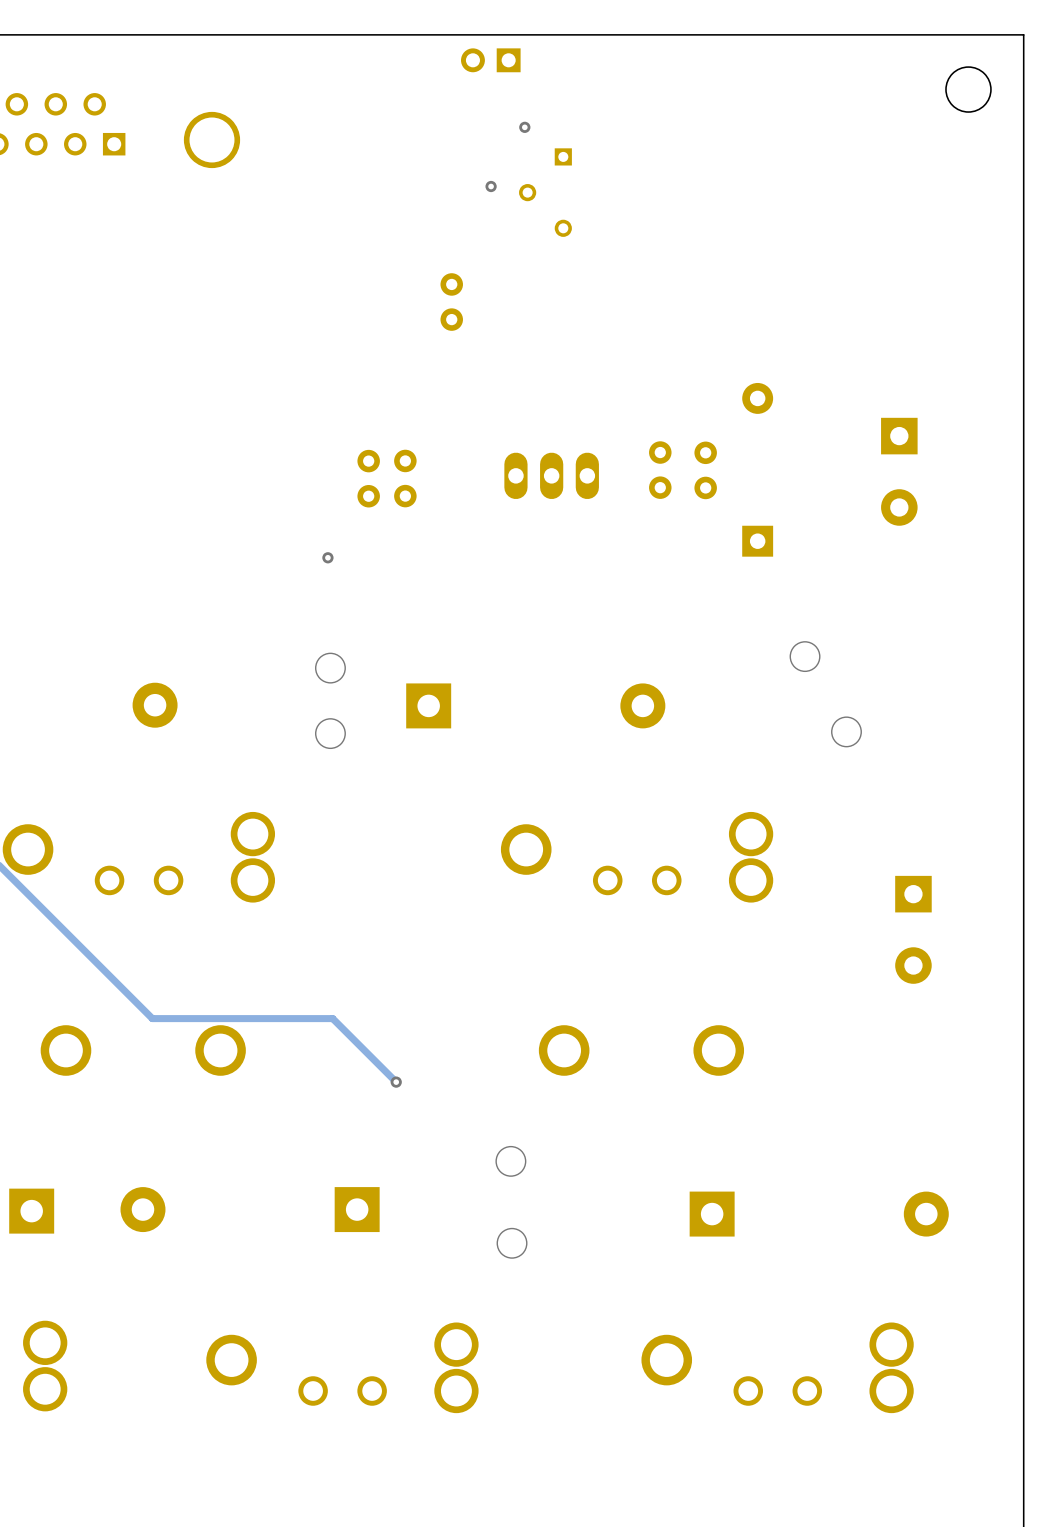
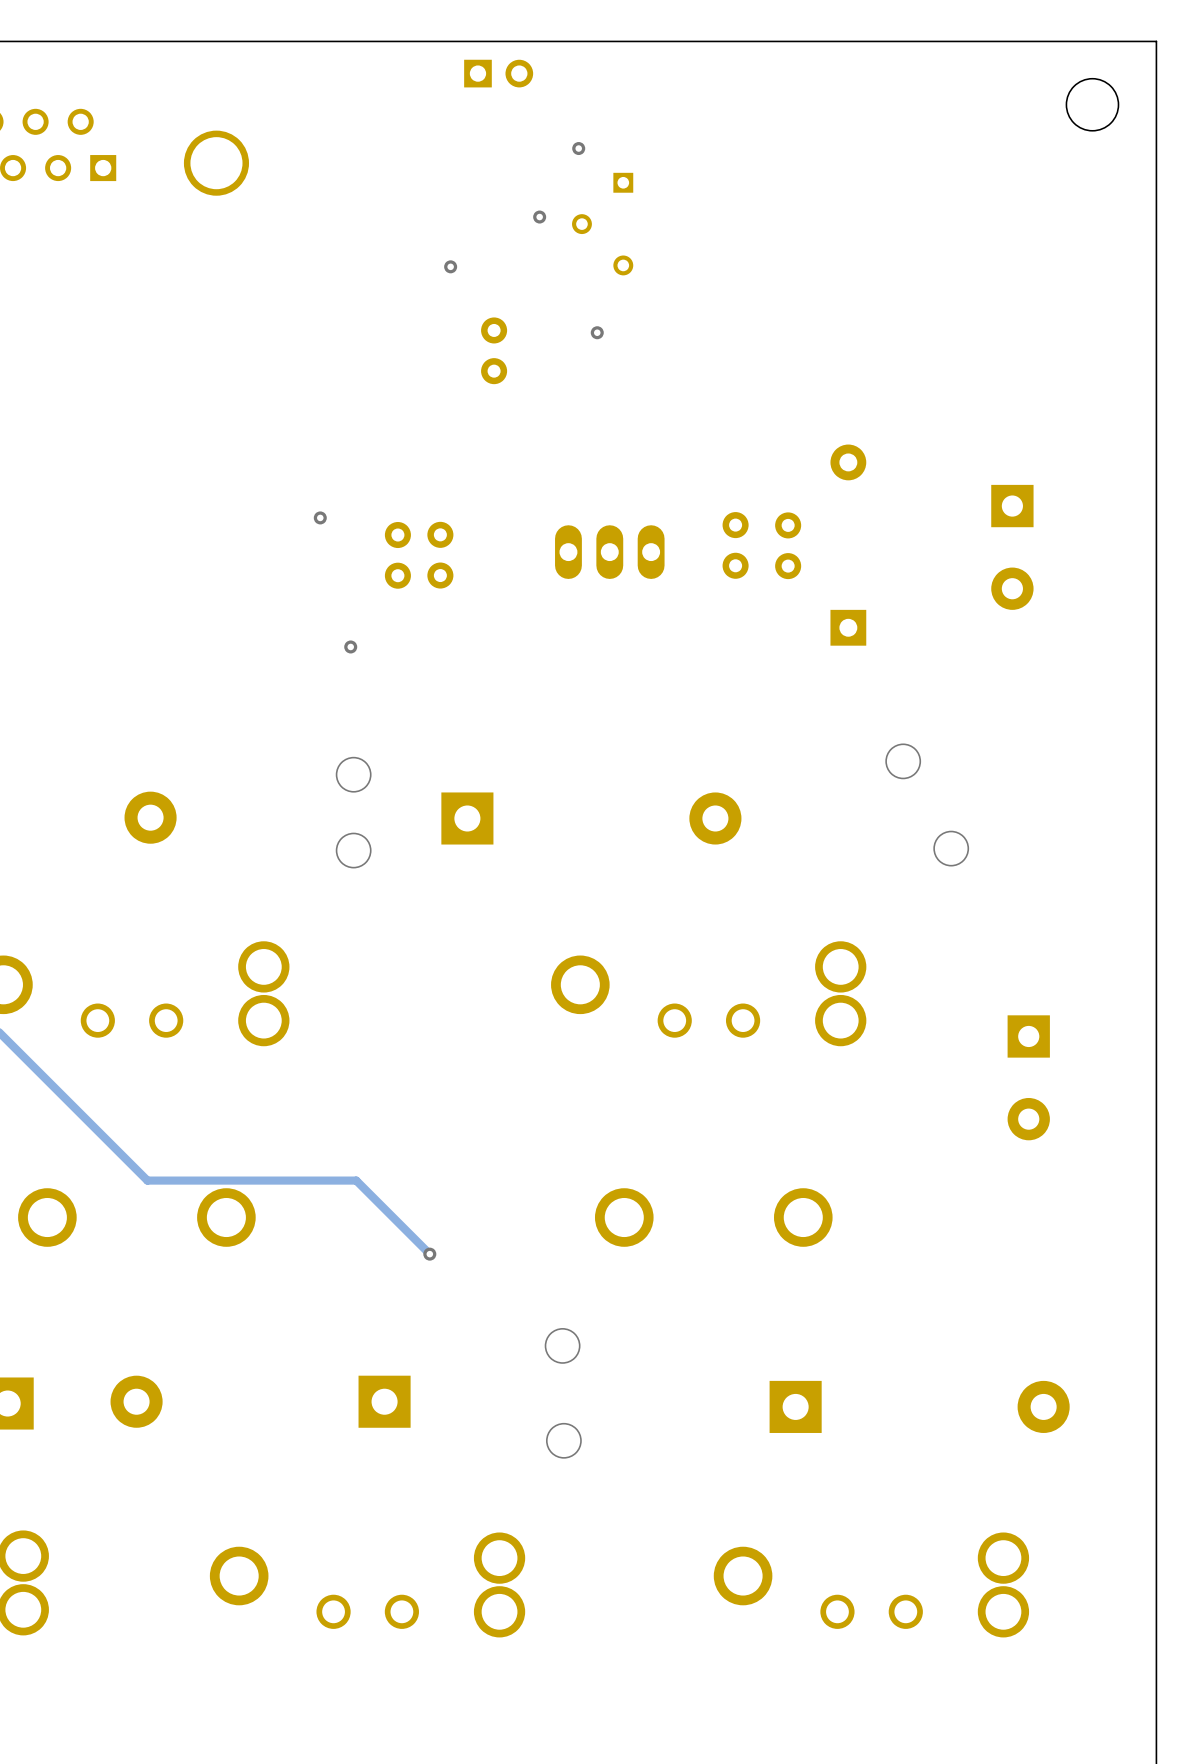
part rotation: 0° (490, 60) -> 180° (498, 73)
via: none -> (450, 266)
via: none -> (597, 332)
via: none -> (320, 517)

